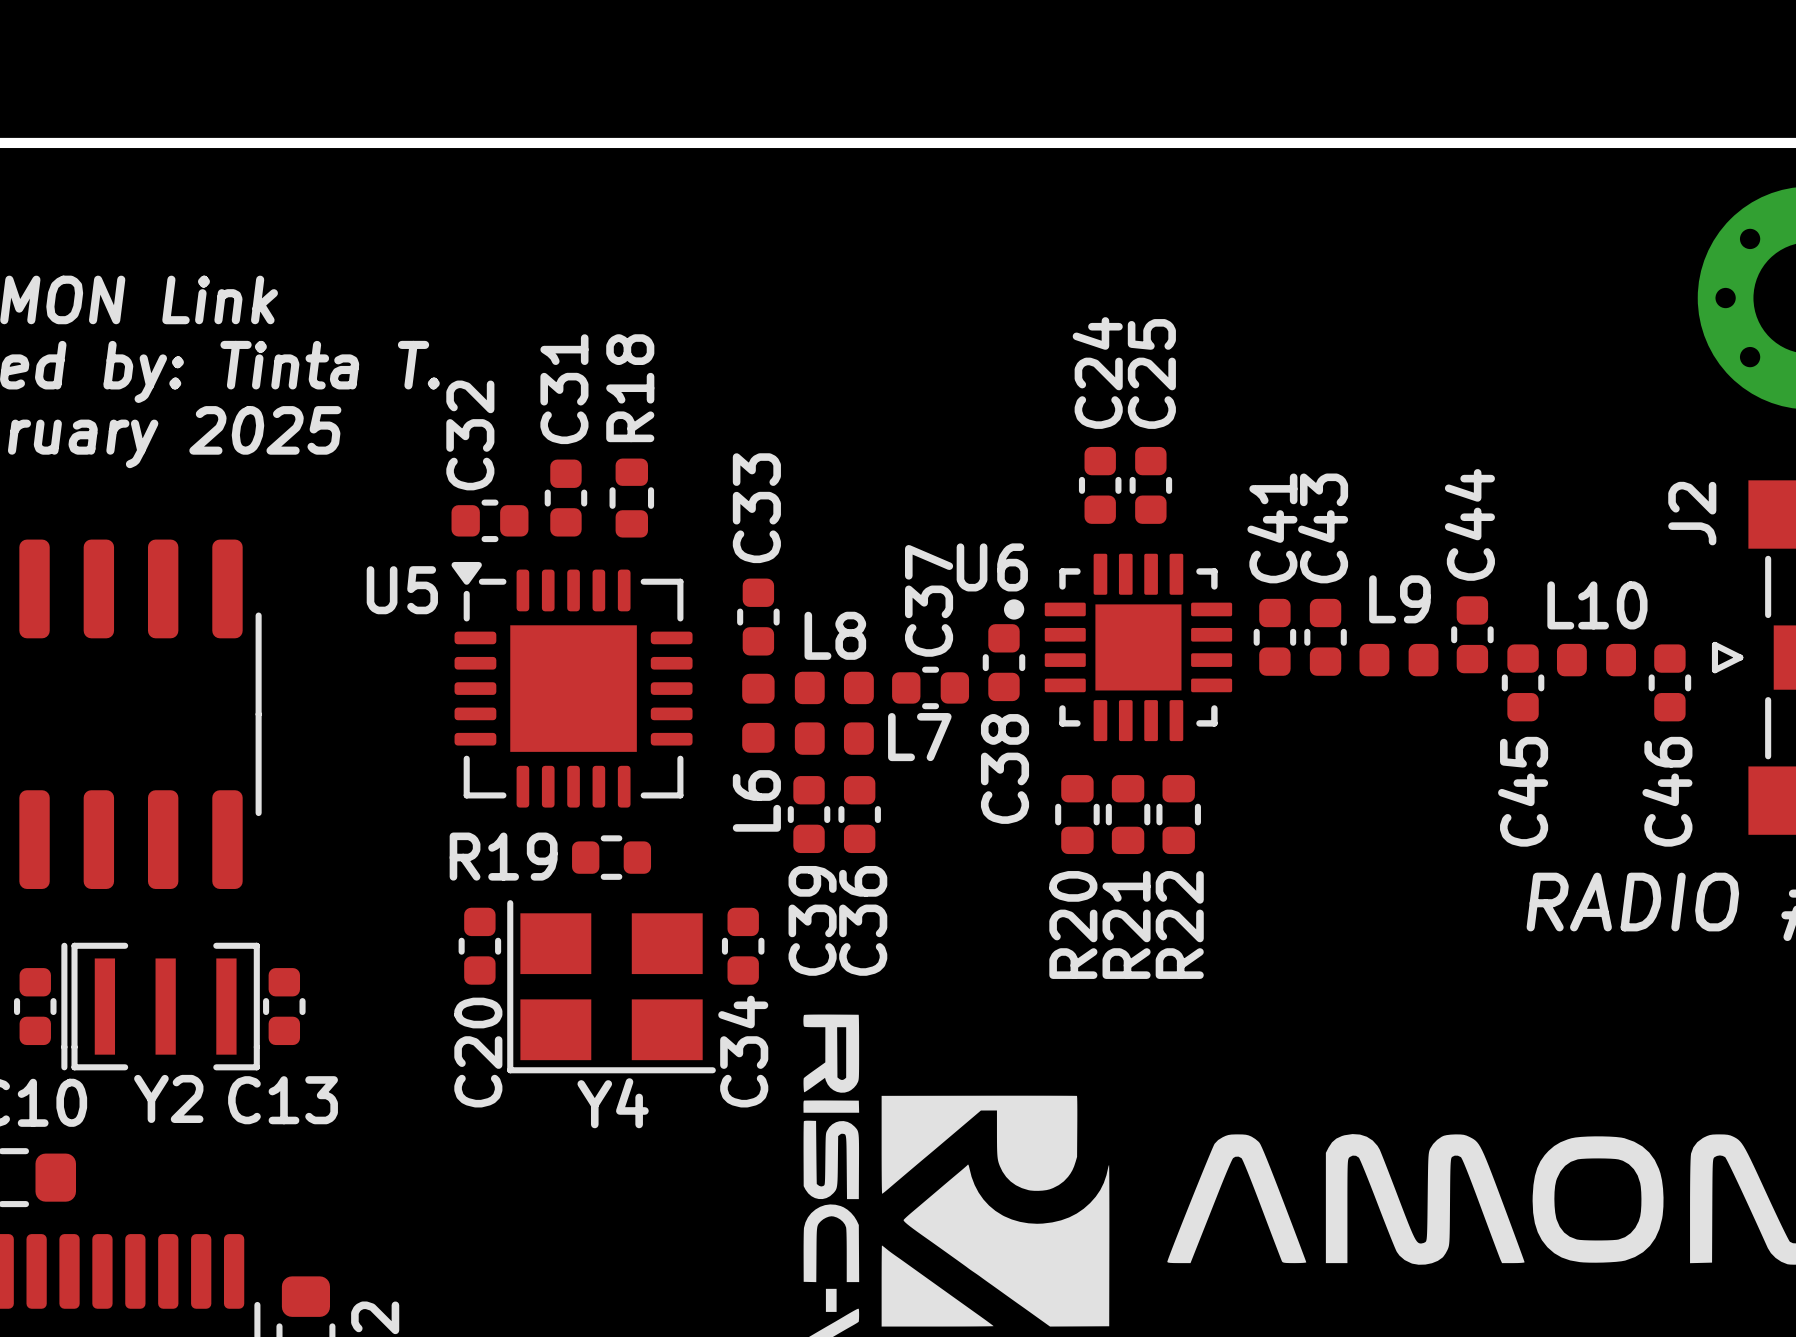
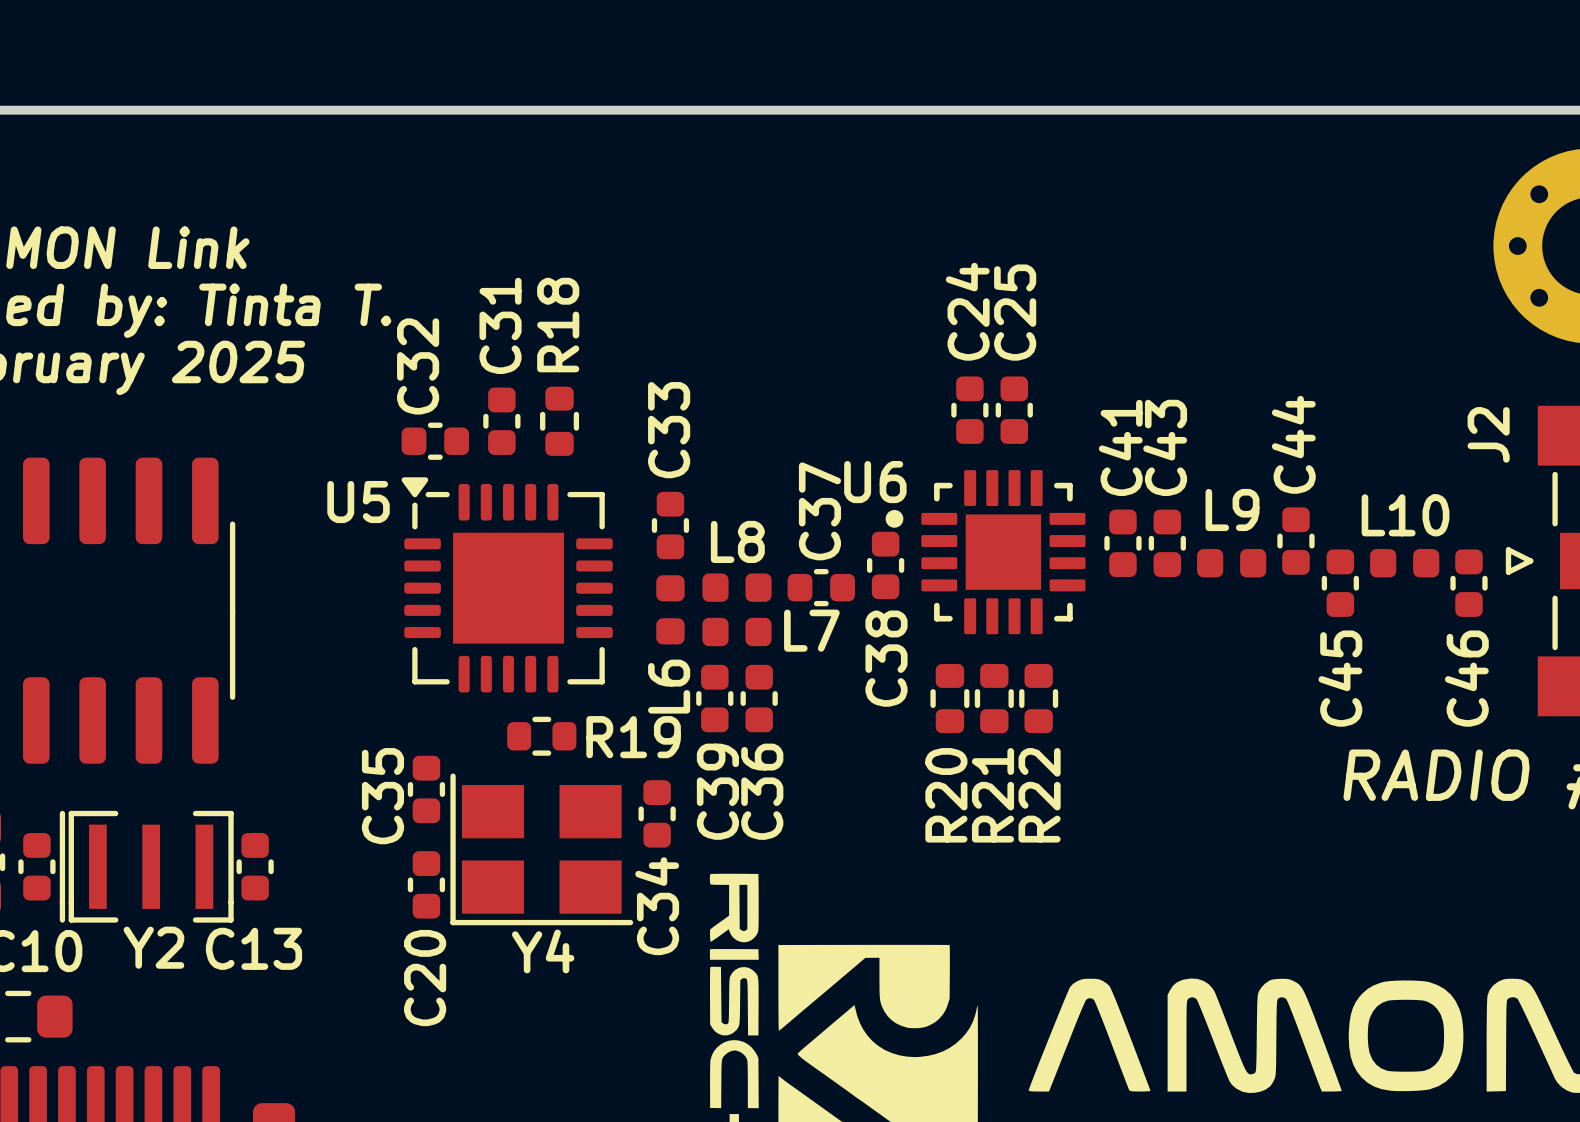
R19 name position: R19 (503, 856) -> R19 (633, 737)
C35: none -> (426, 789)
C20 position: (479, 946) -> (426, 884)

